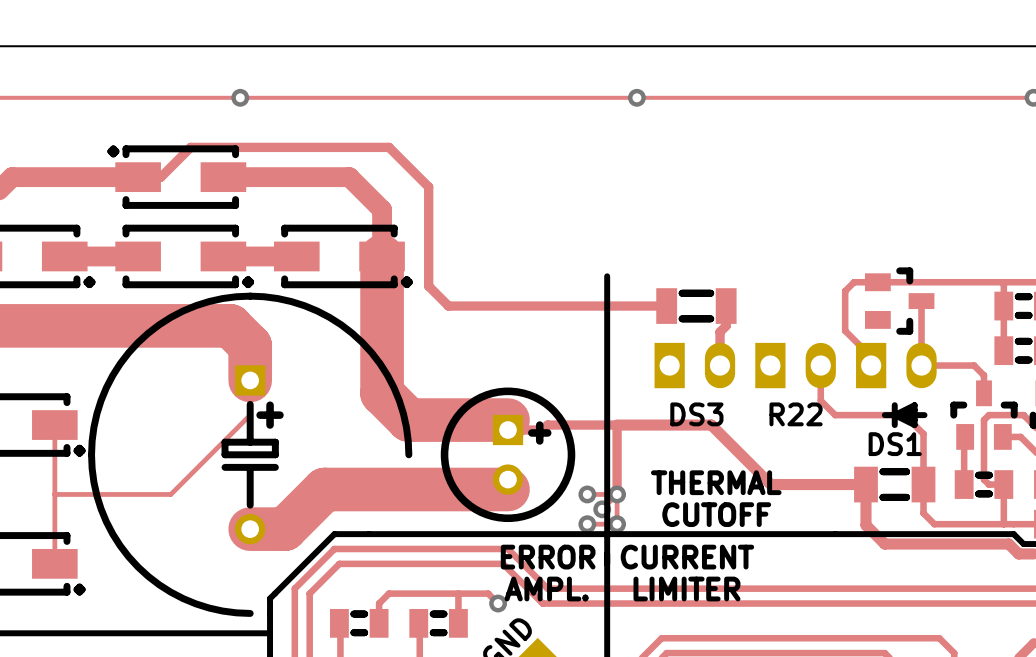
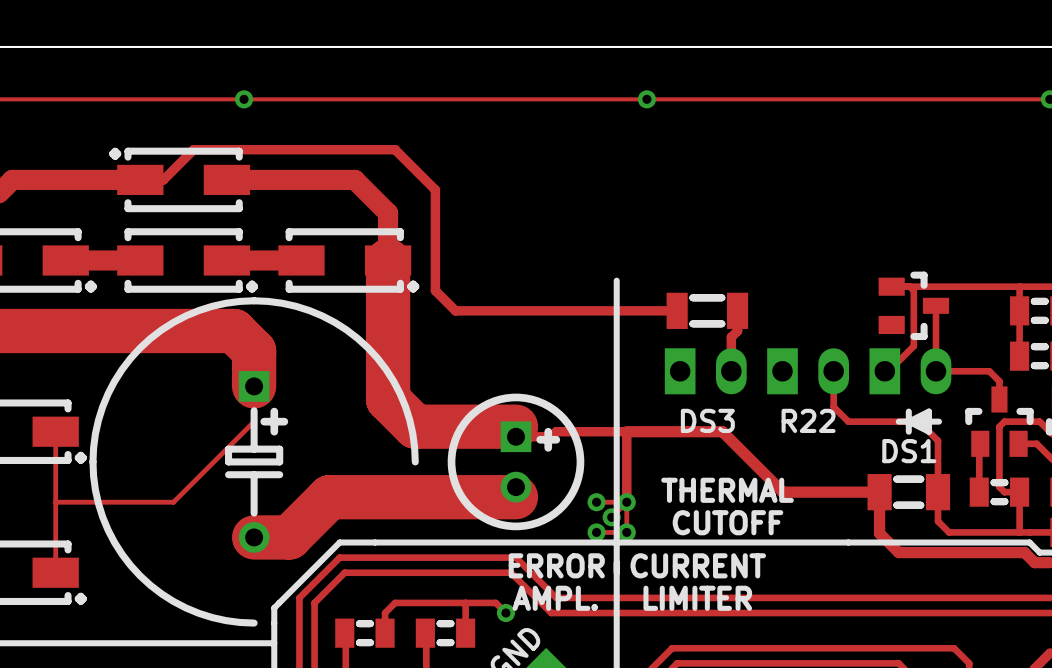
track: (877, 282) (854, 282) (845, 291) (845, 330) (871, 356) (871, 365) -> none
track: none -> (909, 286) (913, 290) (913, 346) (888, 371)

